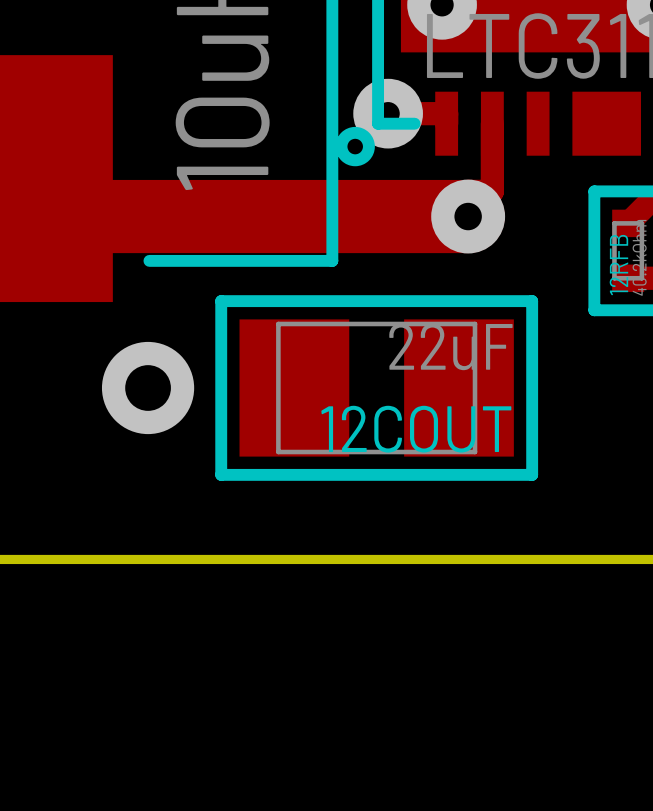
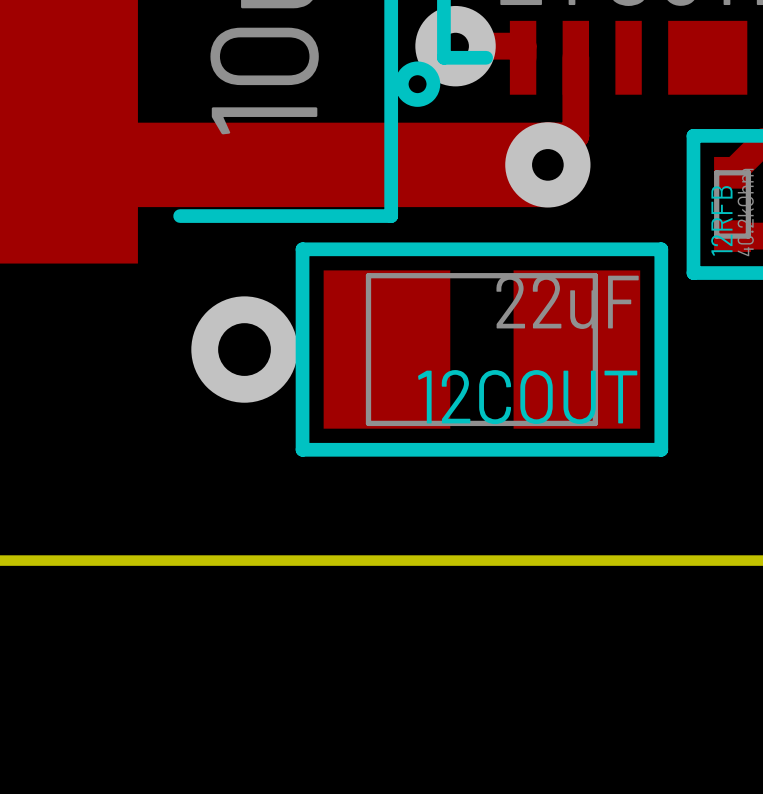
via position: (148, 388) -> (244, 349)
12COUT position: (376, 388) -> (481, 349)

